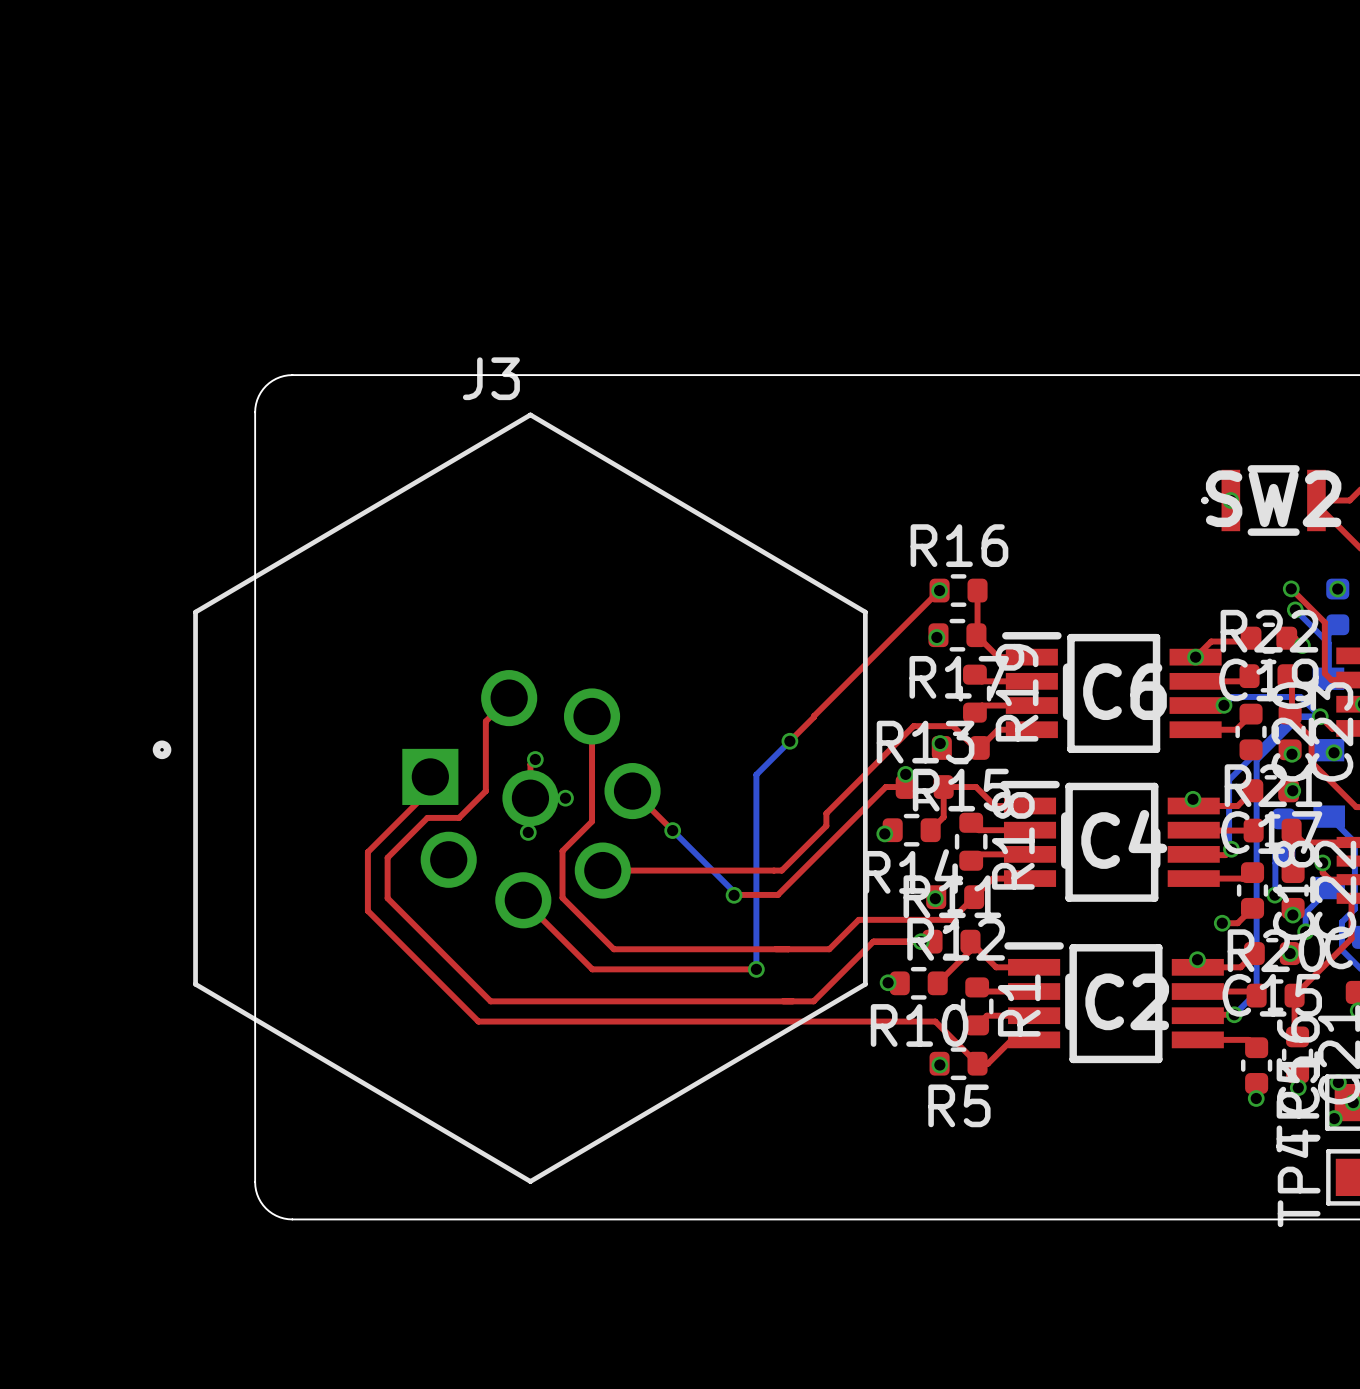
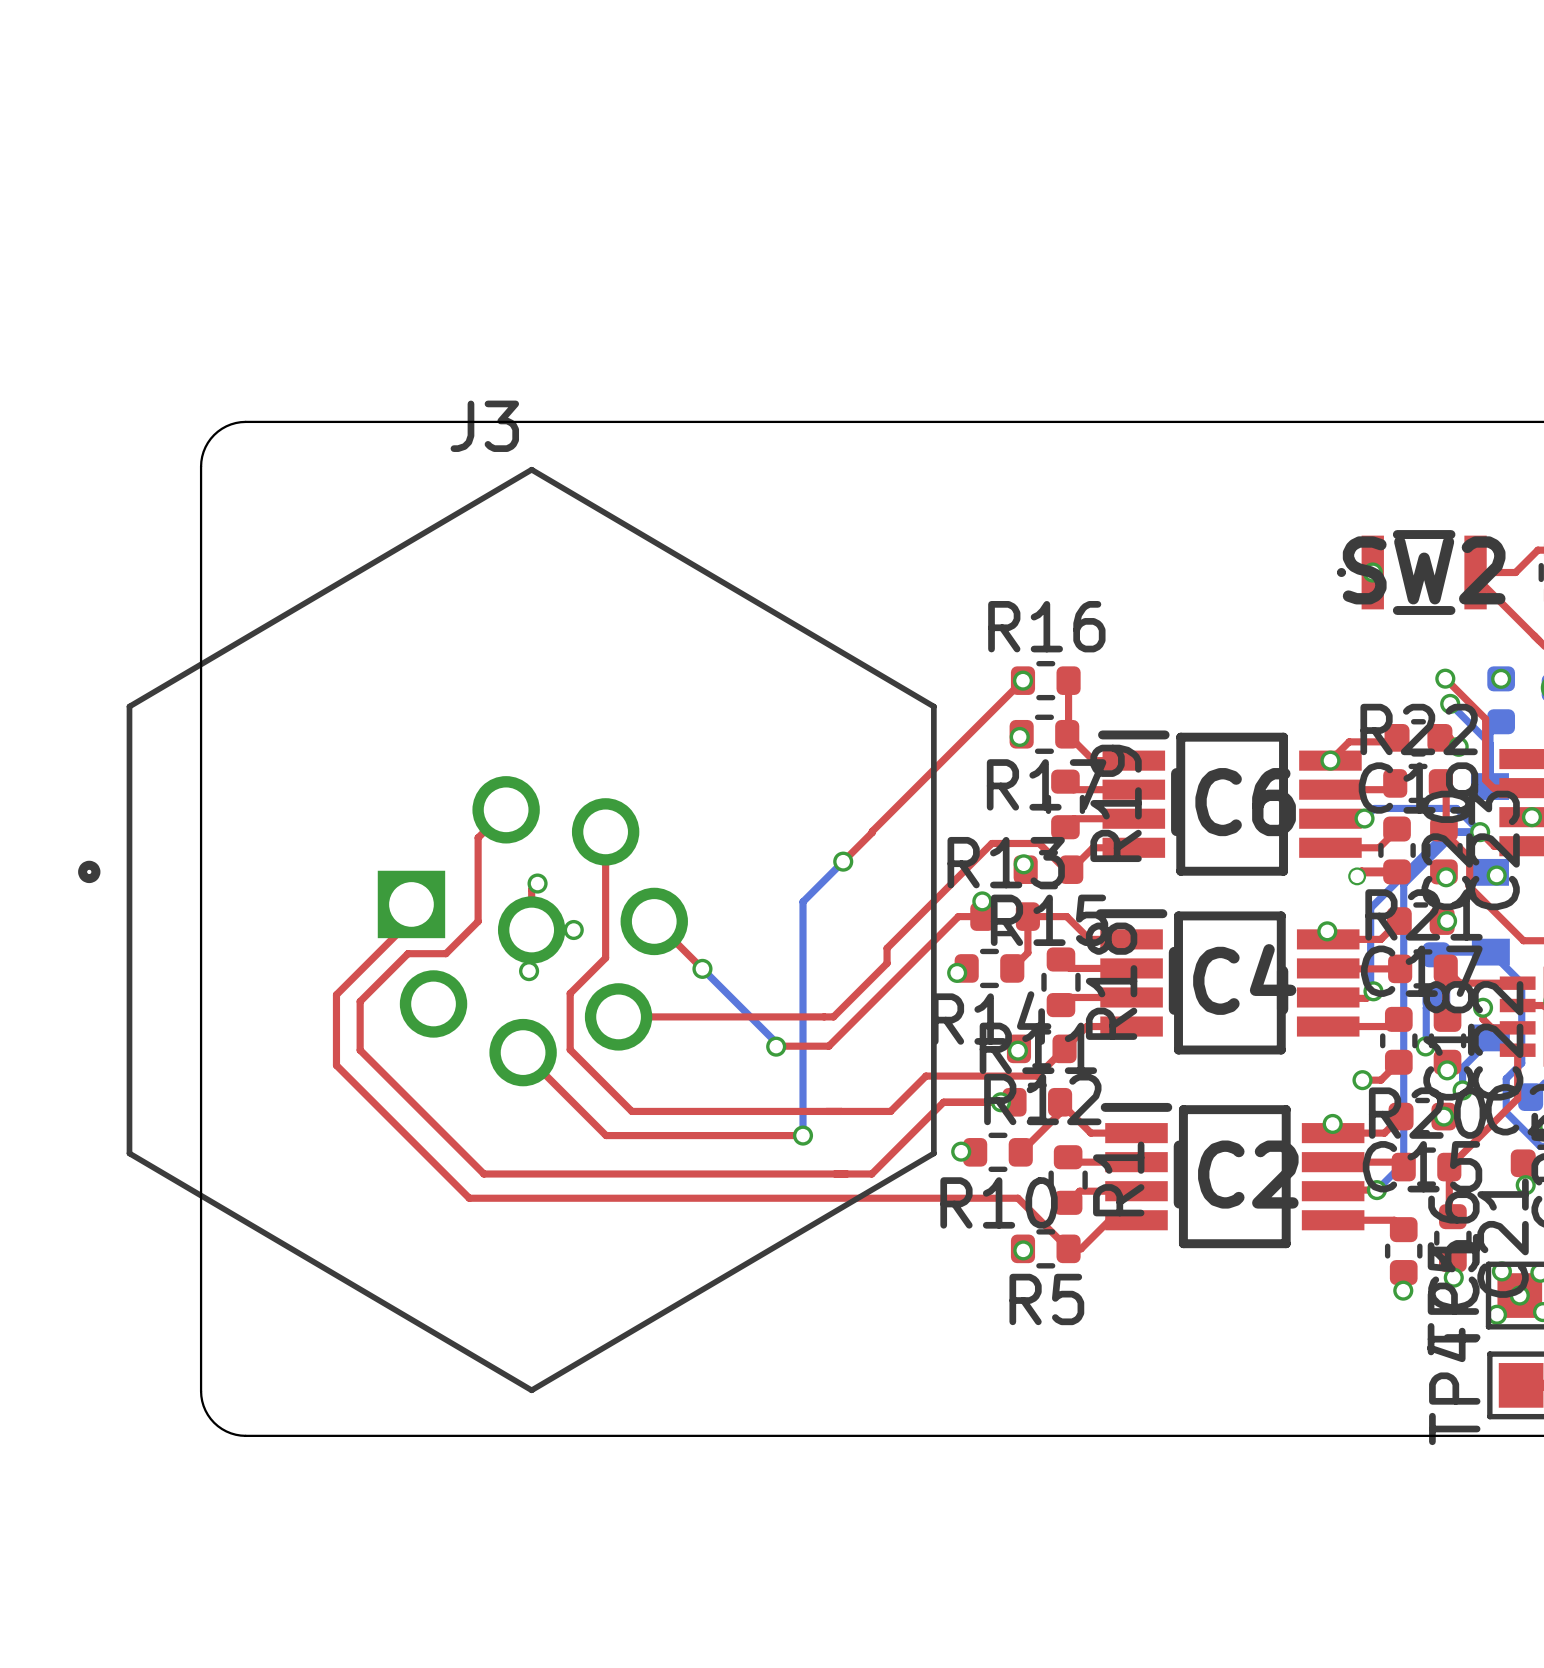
top track: none -> (1397, 871) (1361, 871) (1357, 876)
via: none -> (1357, 876)

